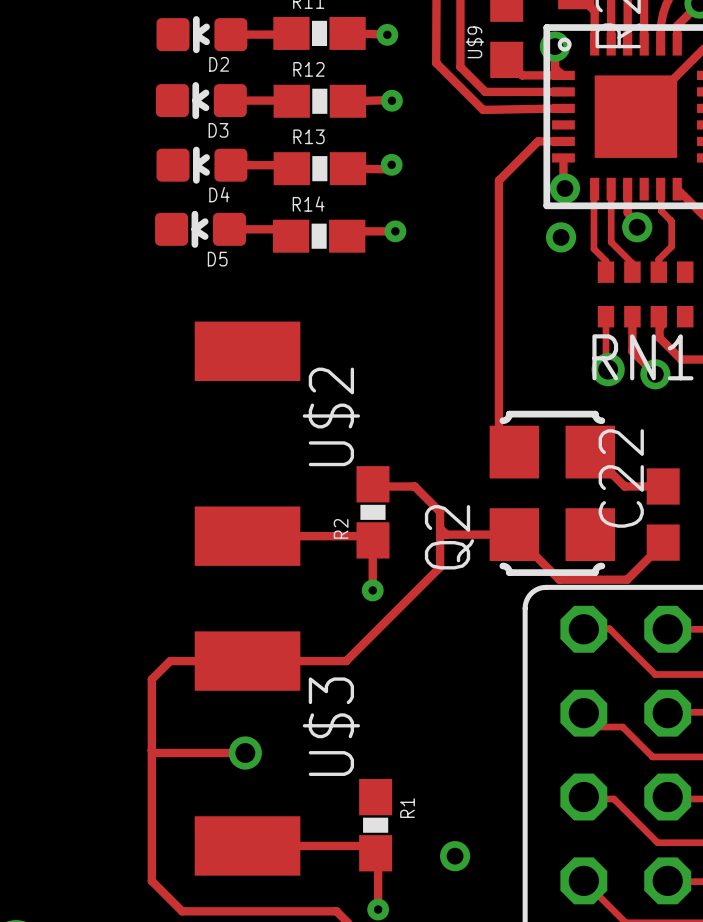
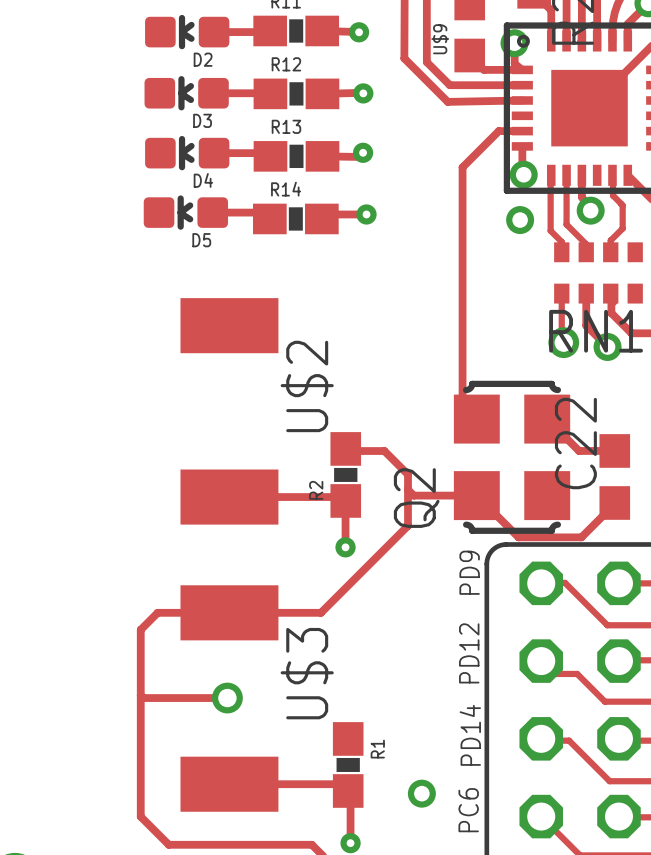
text: none -> PD9 (469, 572)
text: none -> PD12 (469, 653)
text: none -> PD14 (470, 735)
text: none -> PC6 (468, 810)

